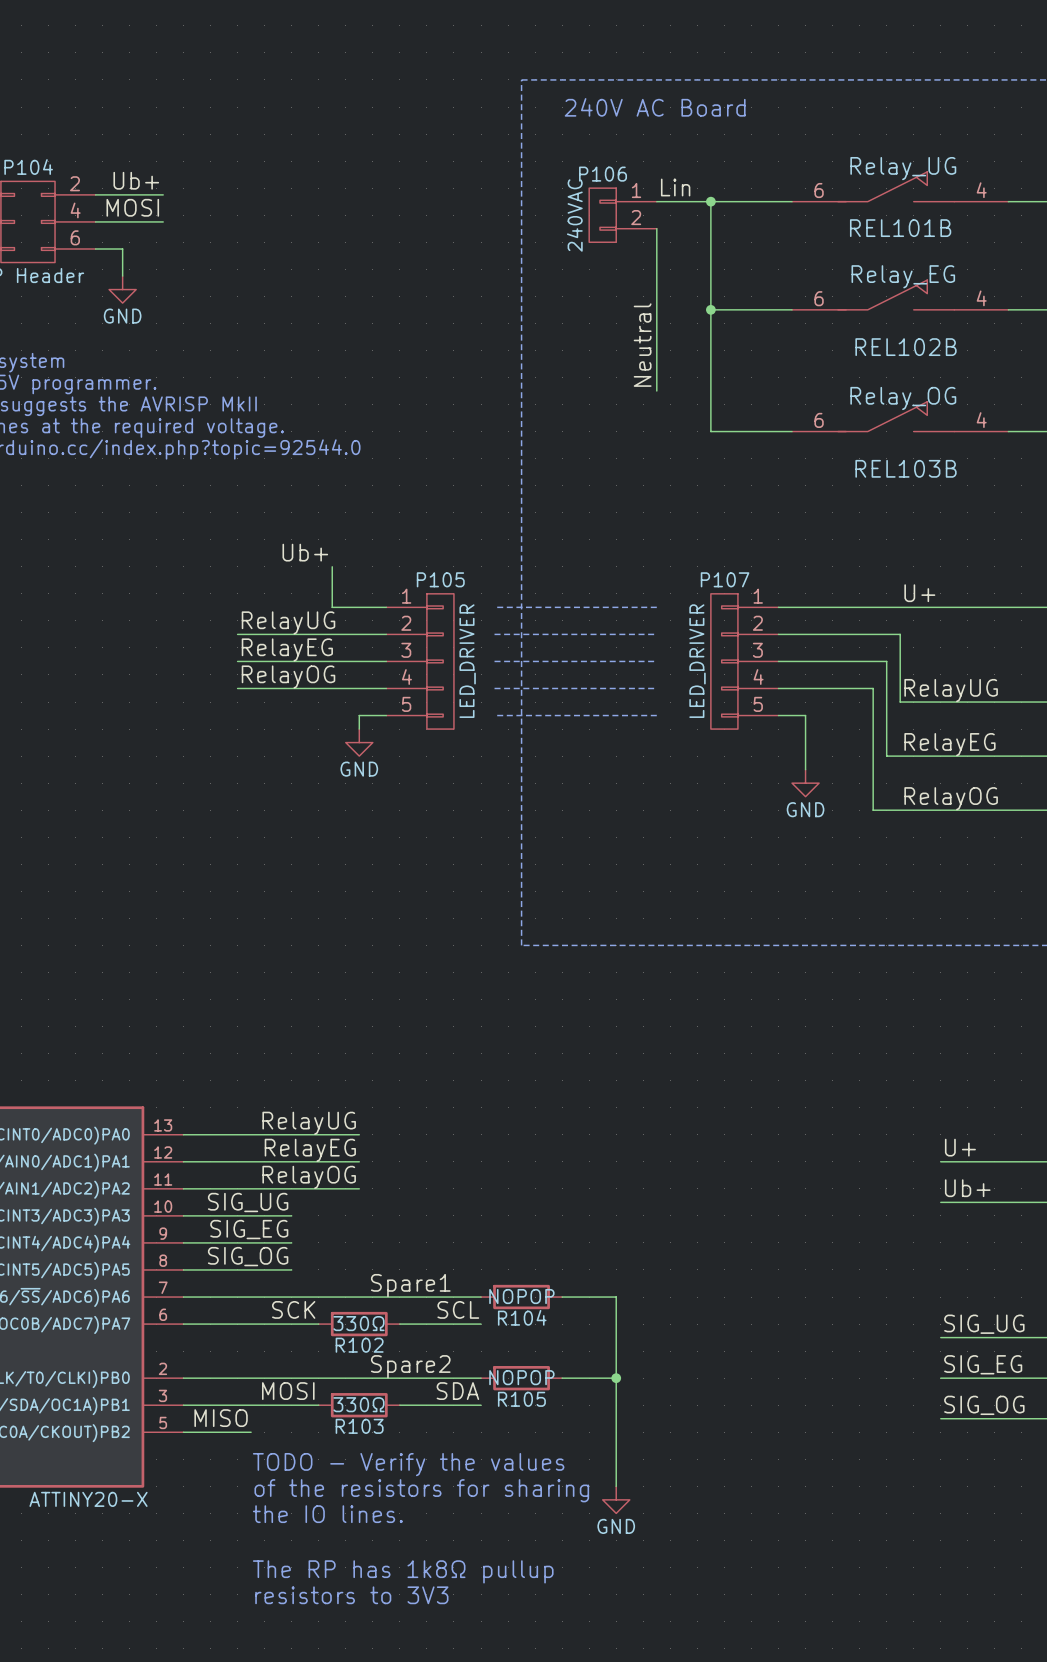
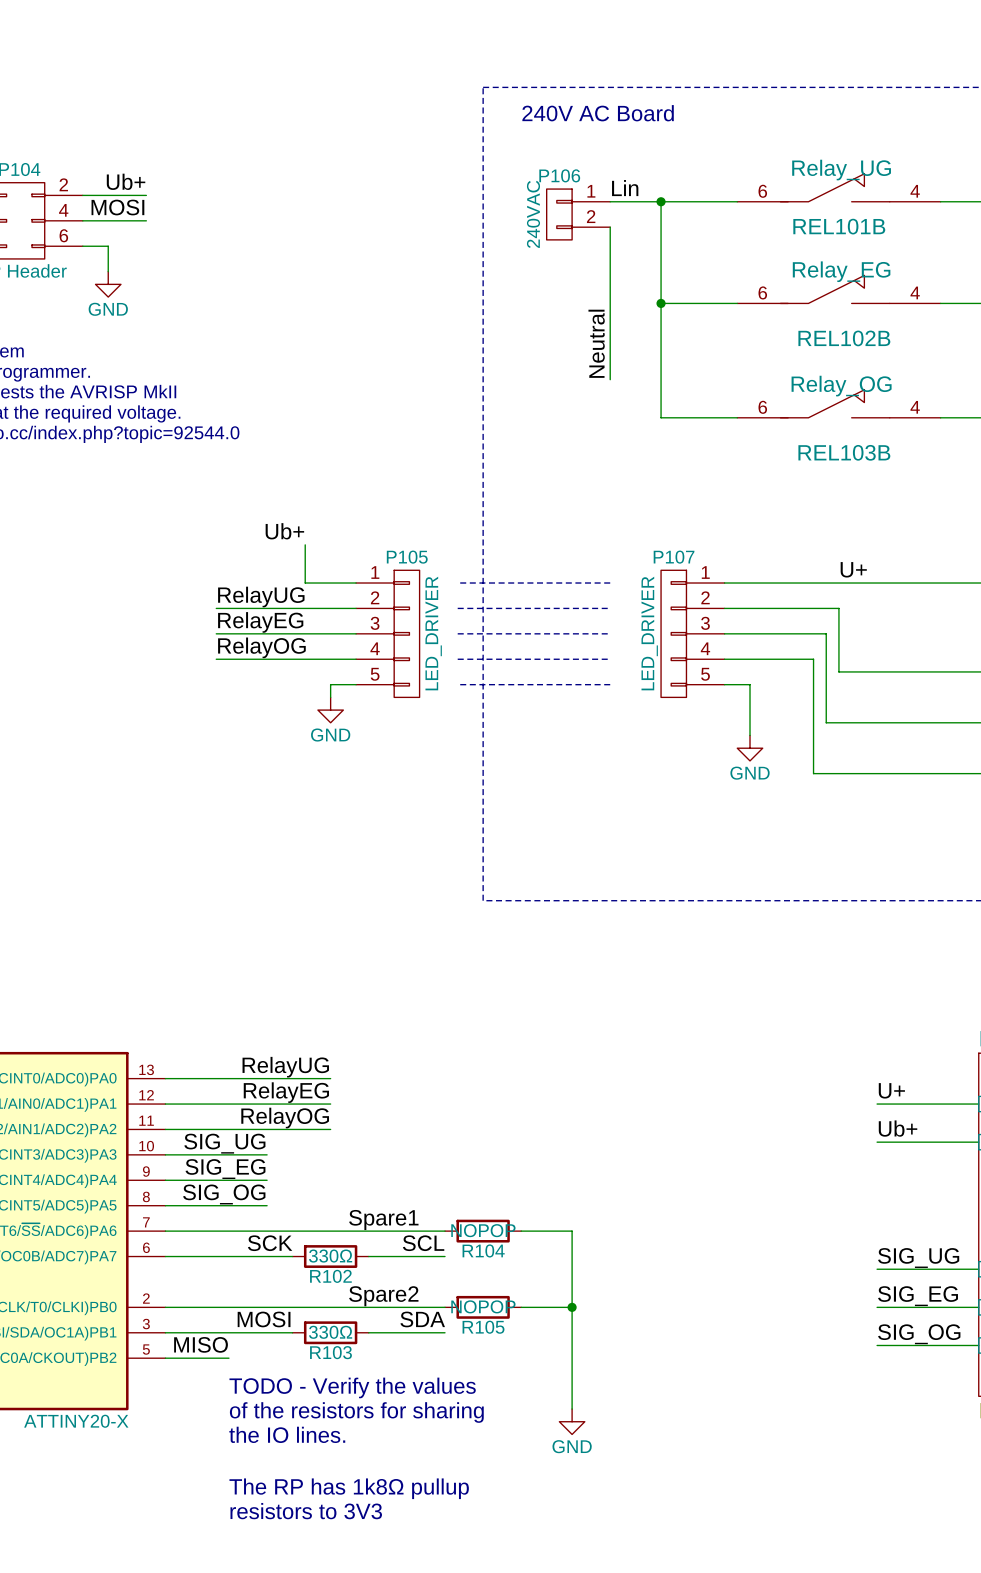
label: RelayUG (951, 690) -> none
label: RelayEG (949, 744) -> none
label: RelayOG (951, 798) -> none

